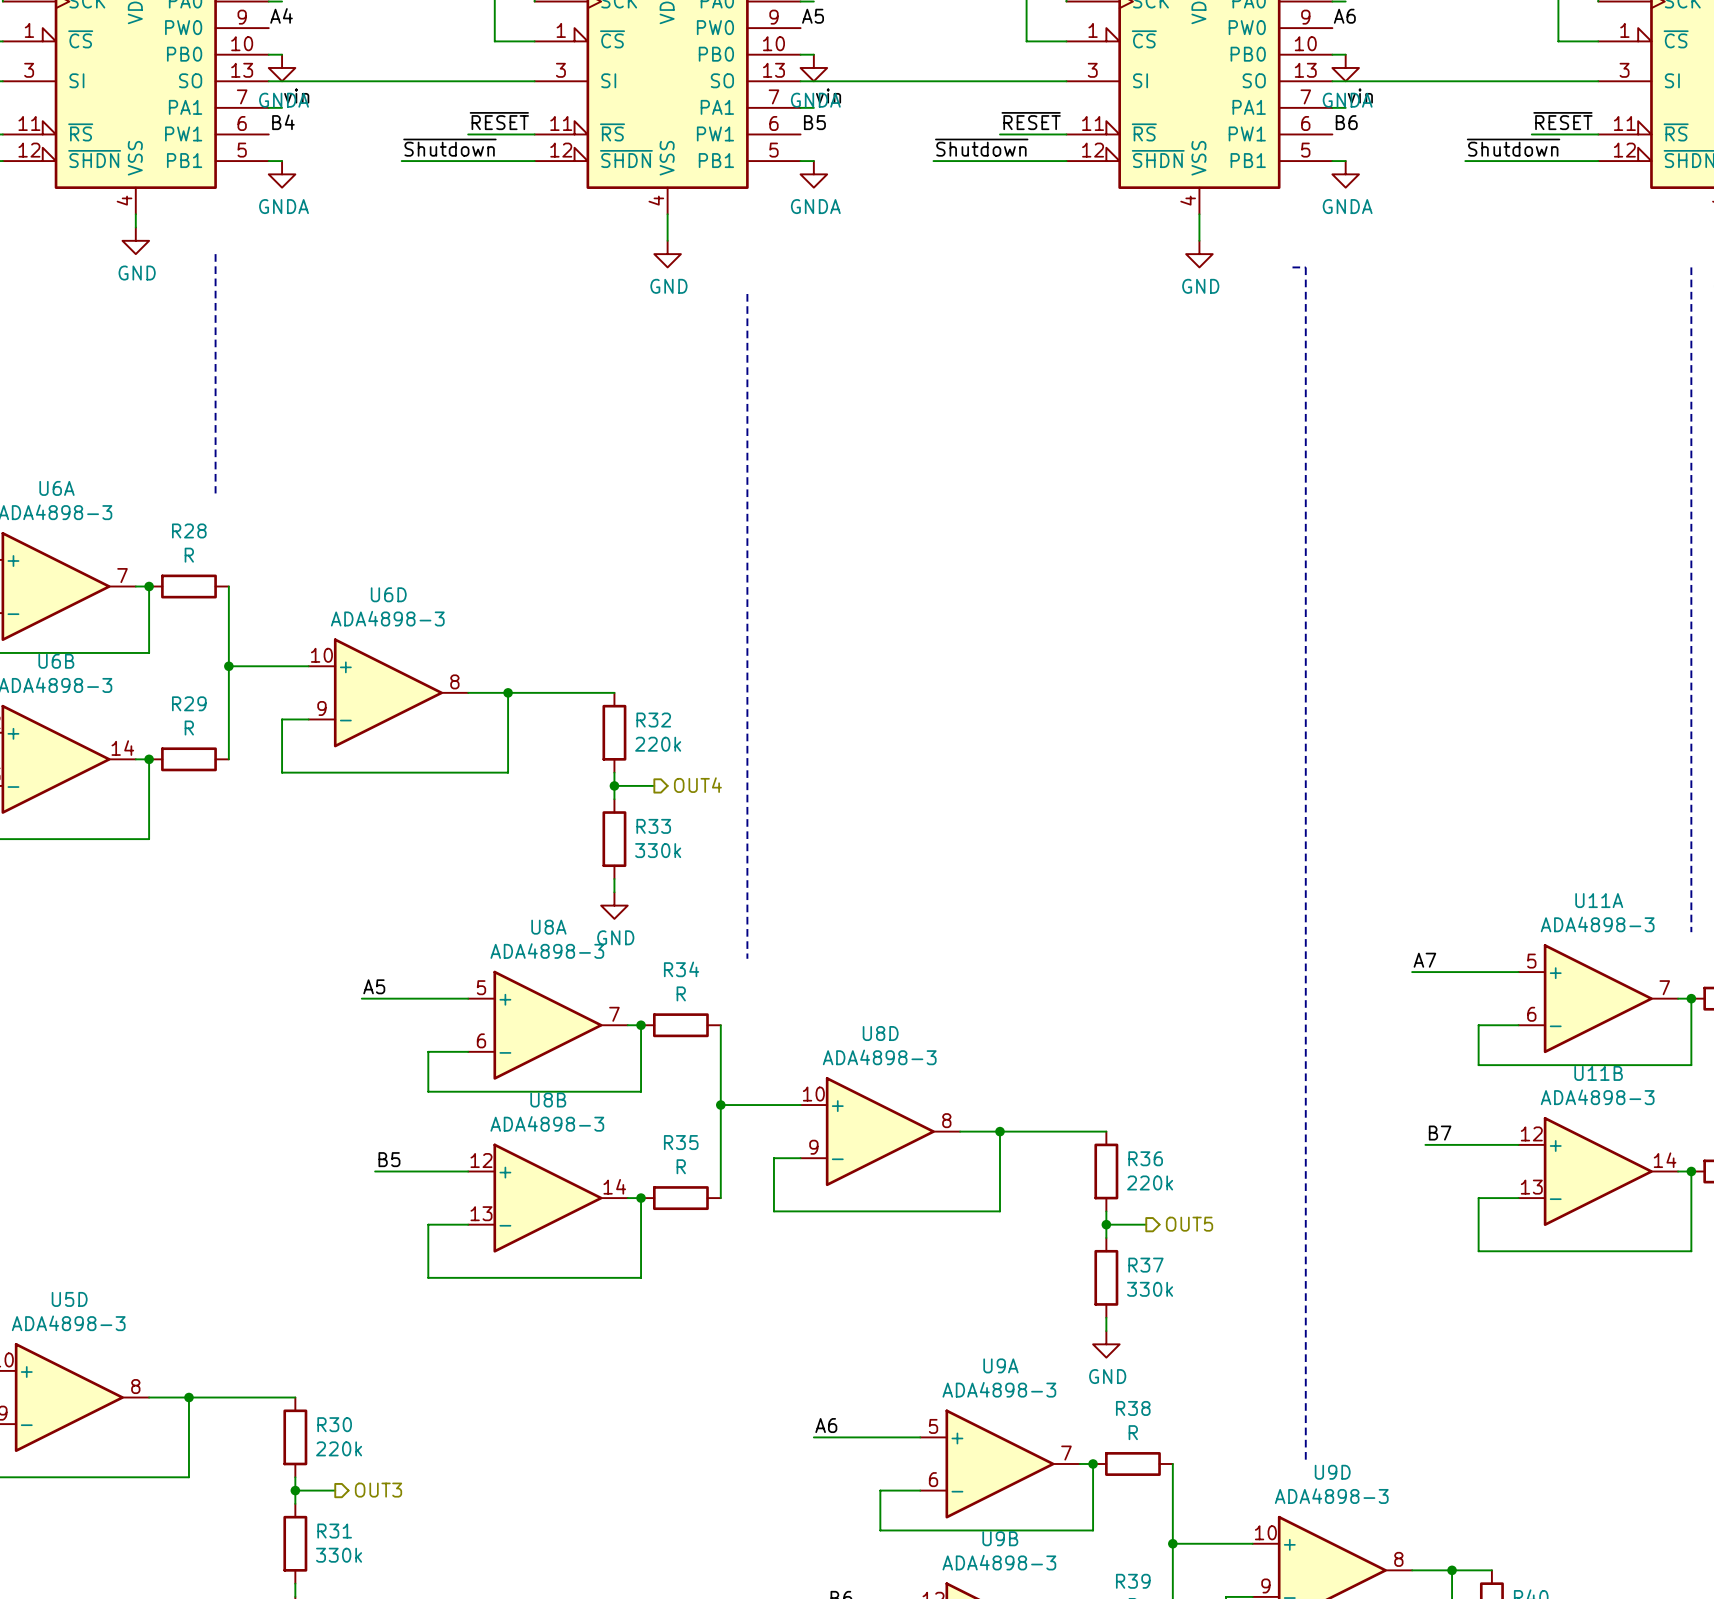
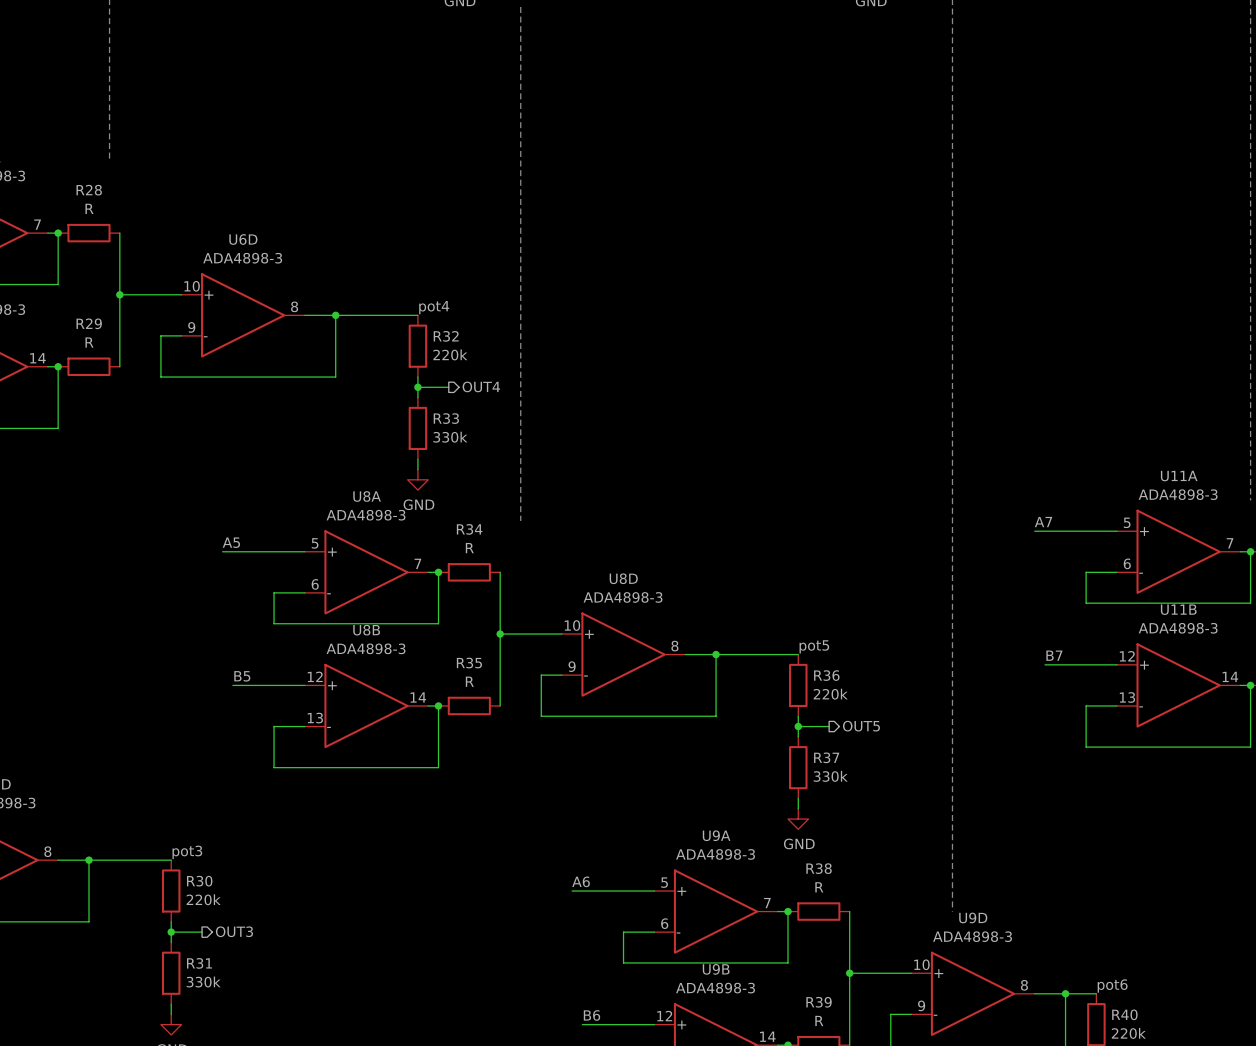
label: none -> pot4 (434, 307)
label: none -> pot5 (814, 646)
label: none -> pot3 (187, 852)
label: none -> pot6 (1112, 986)

